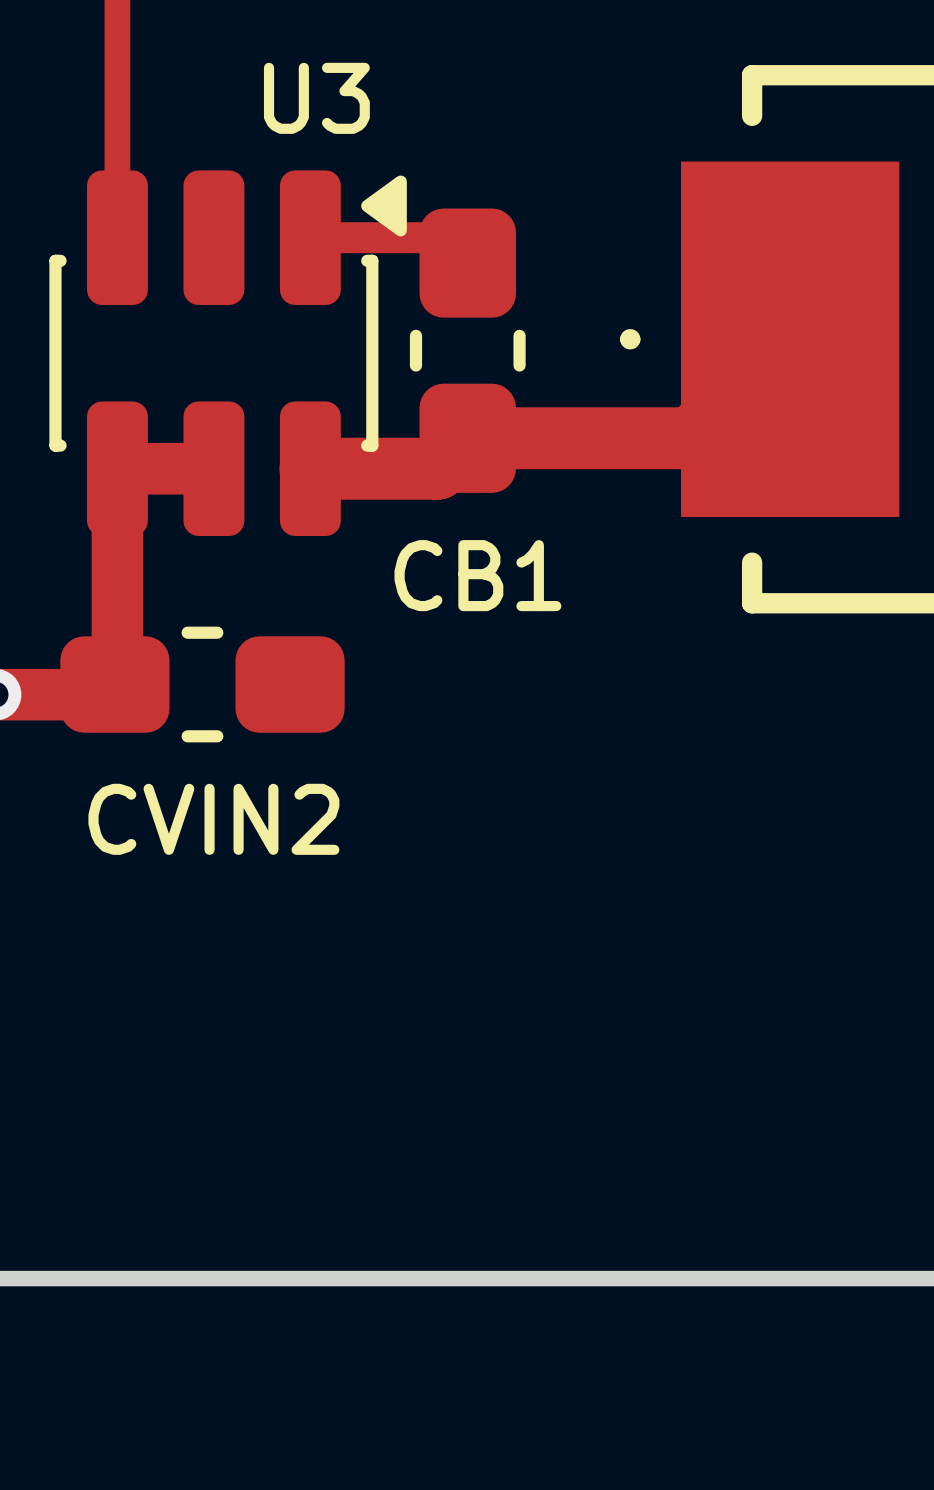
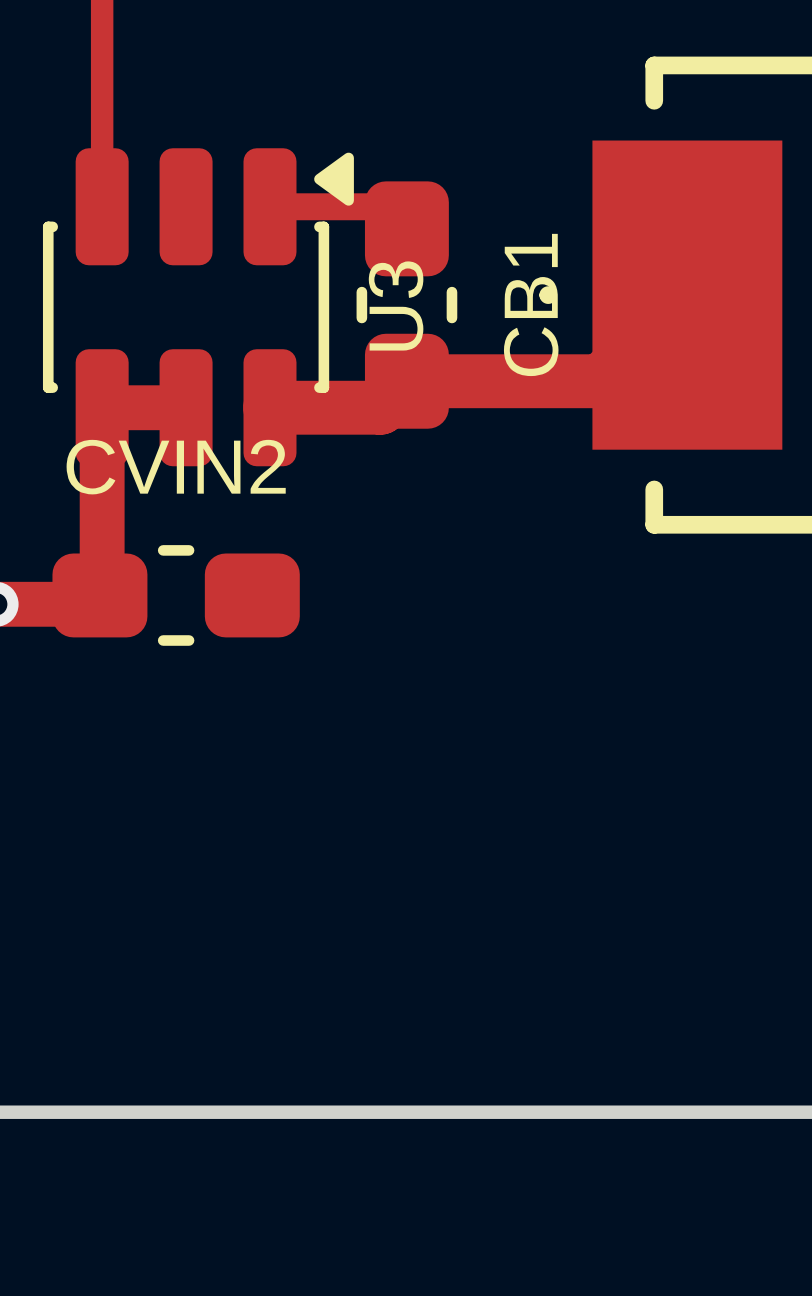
U3 name rotation: 0° (316, 98) -> 90° counterclockwise (396, 305)
U3 name position: U3 (316, 98) -> U3 (396, 305)
CB1 name rotation: 0° (477, 575) -> 90° counterclockwise (531, 304)
CB1 name position: CB1 (477, 575) -> CB1 (531, 304)
CVIN2 name position: CVIN2 (213, 819) -> CVIN2 (176, 467)

